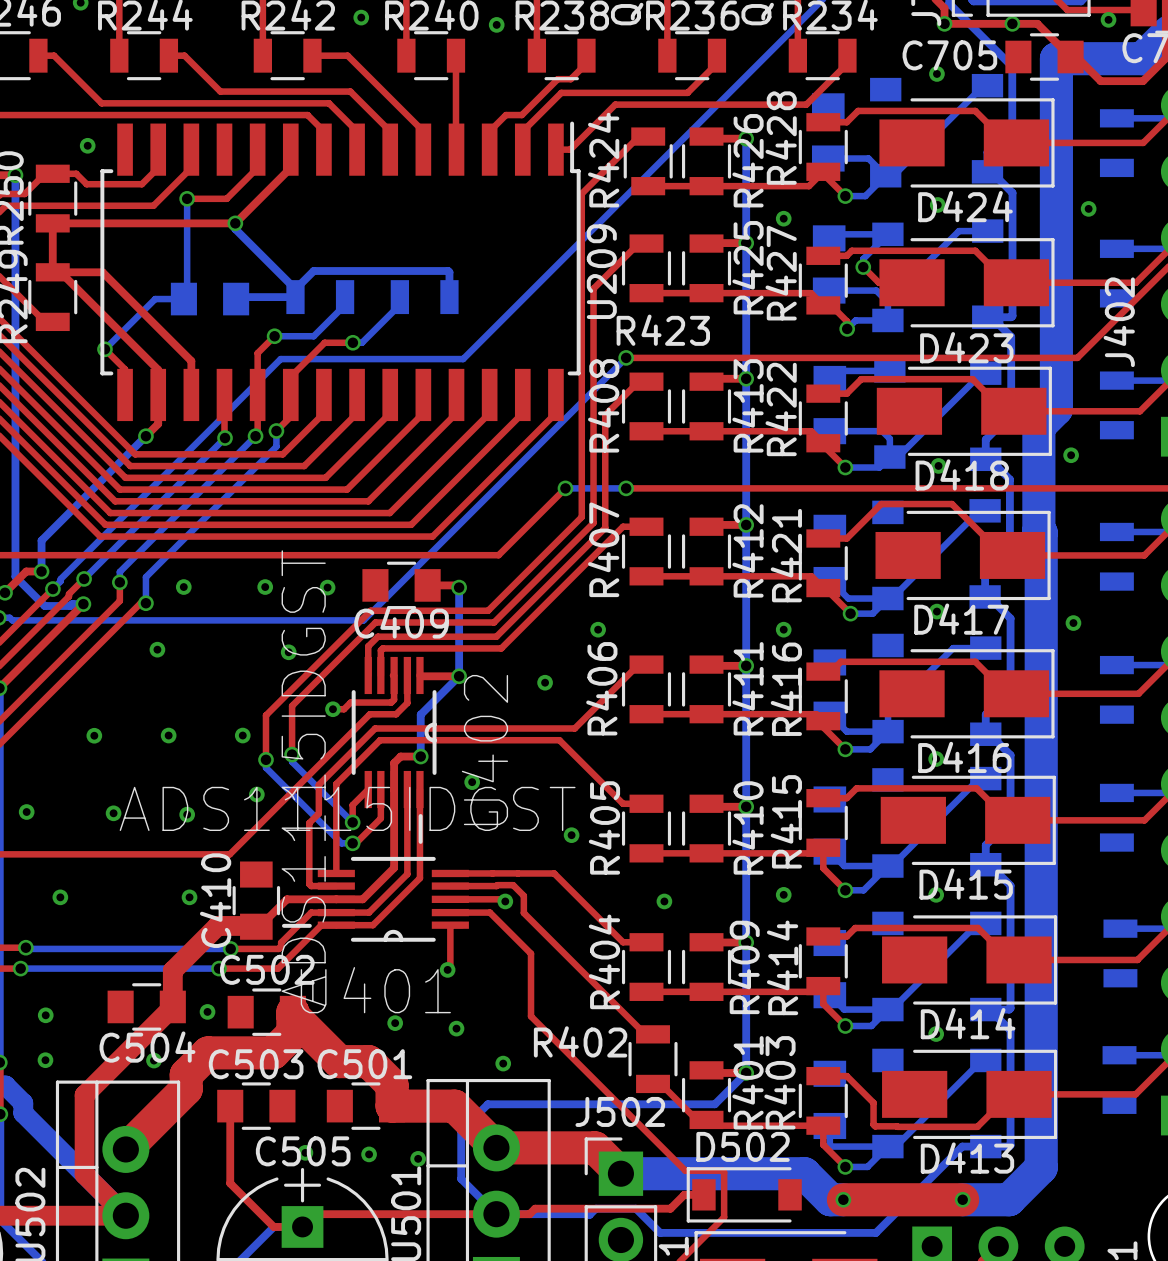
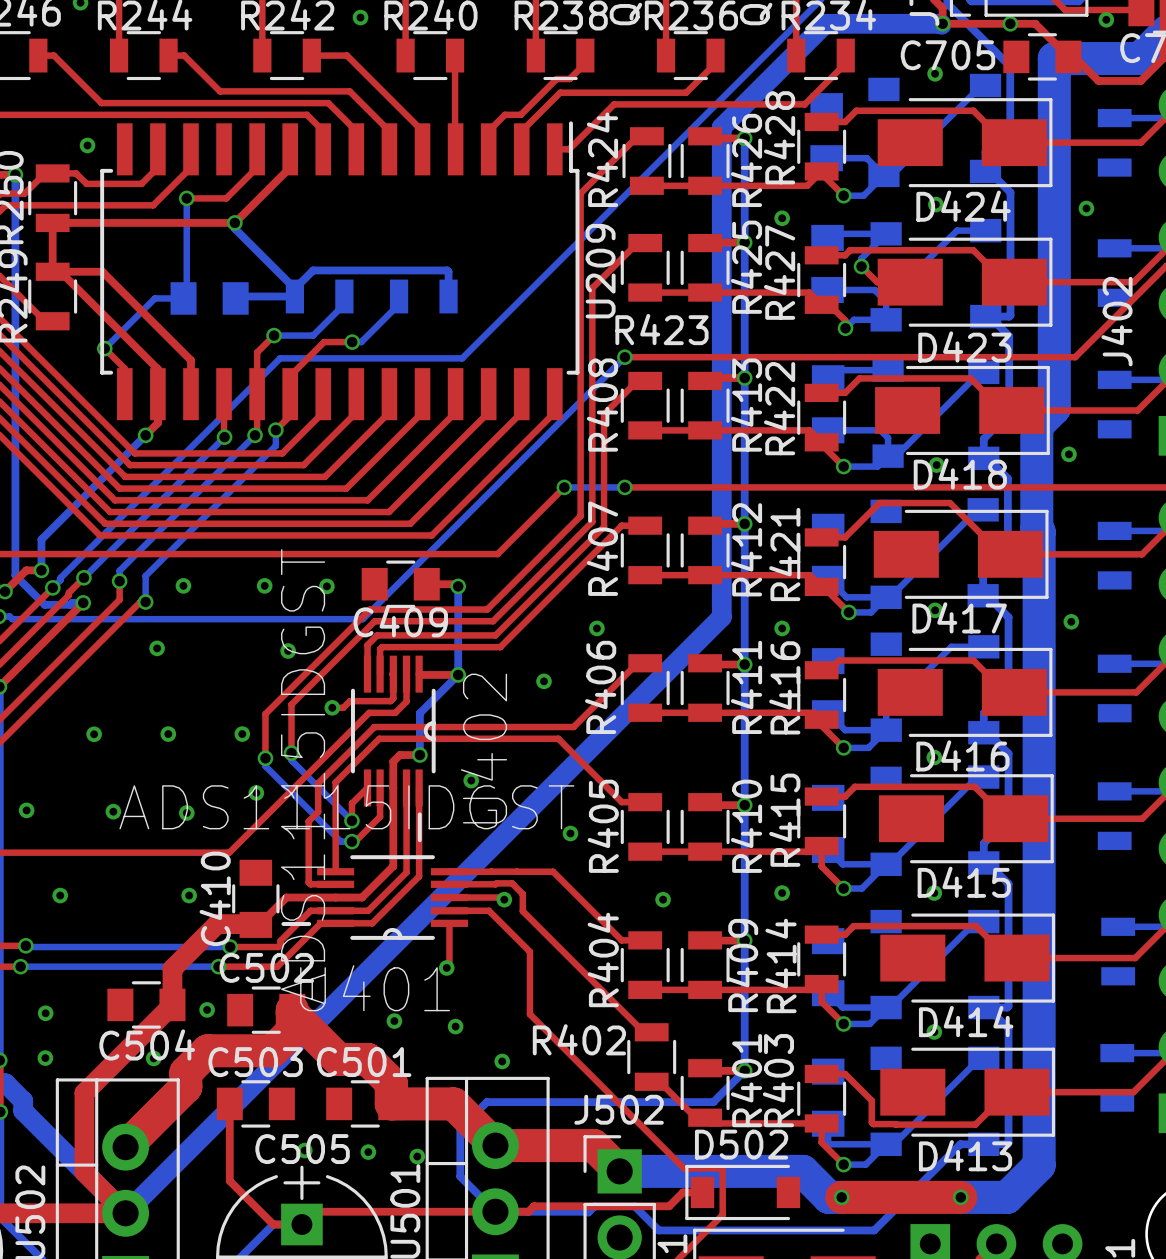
part: (496, 24) -> none
bottom track: none -> (941, 24) (825, 23) (721, 127) (721, 617) (125, 1213)

